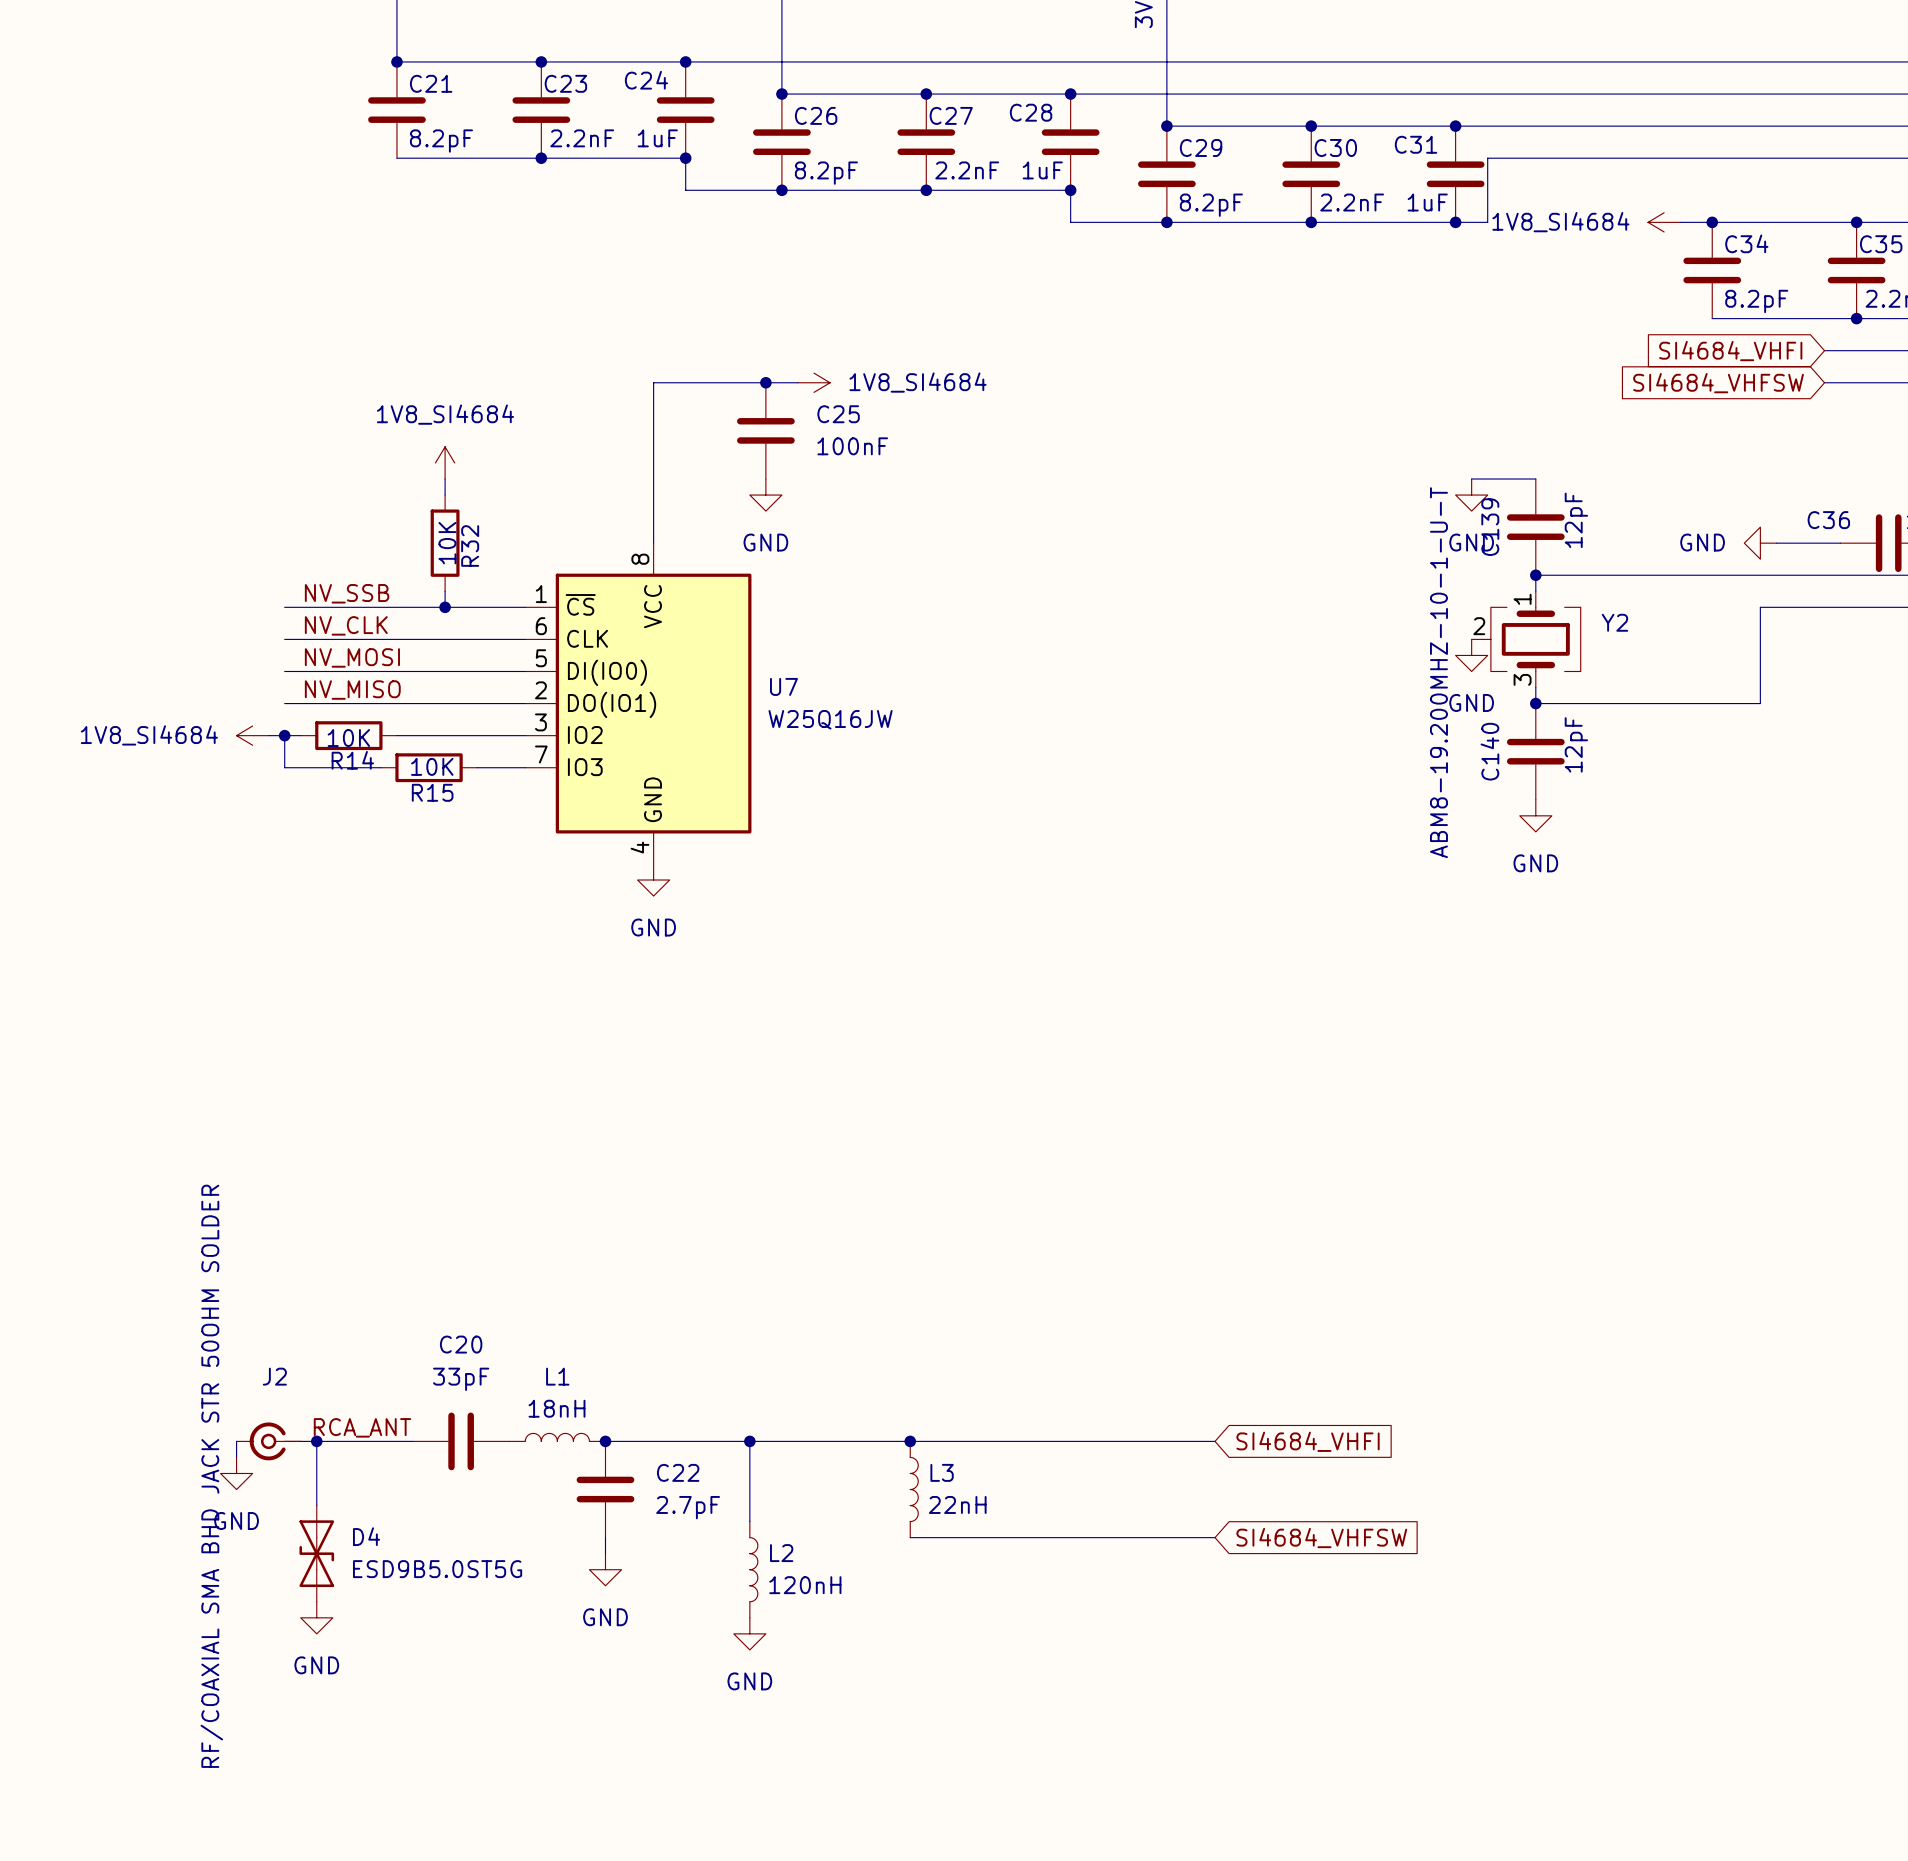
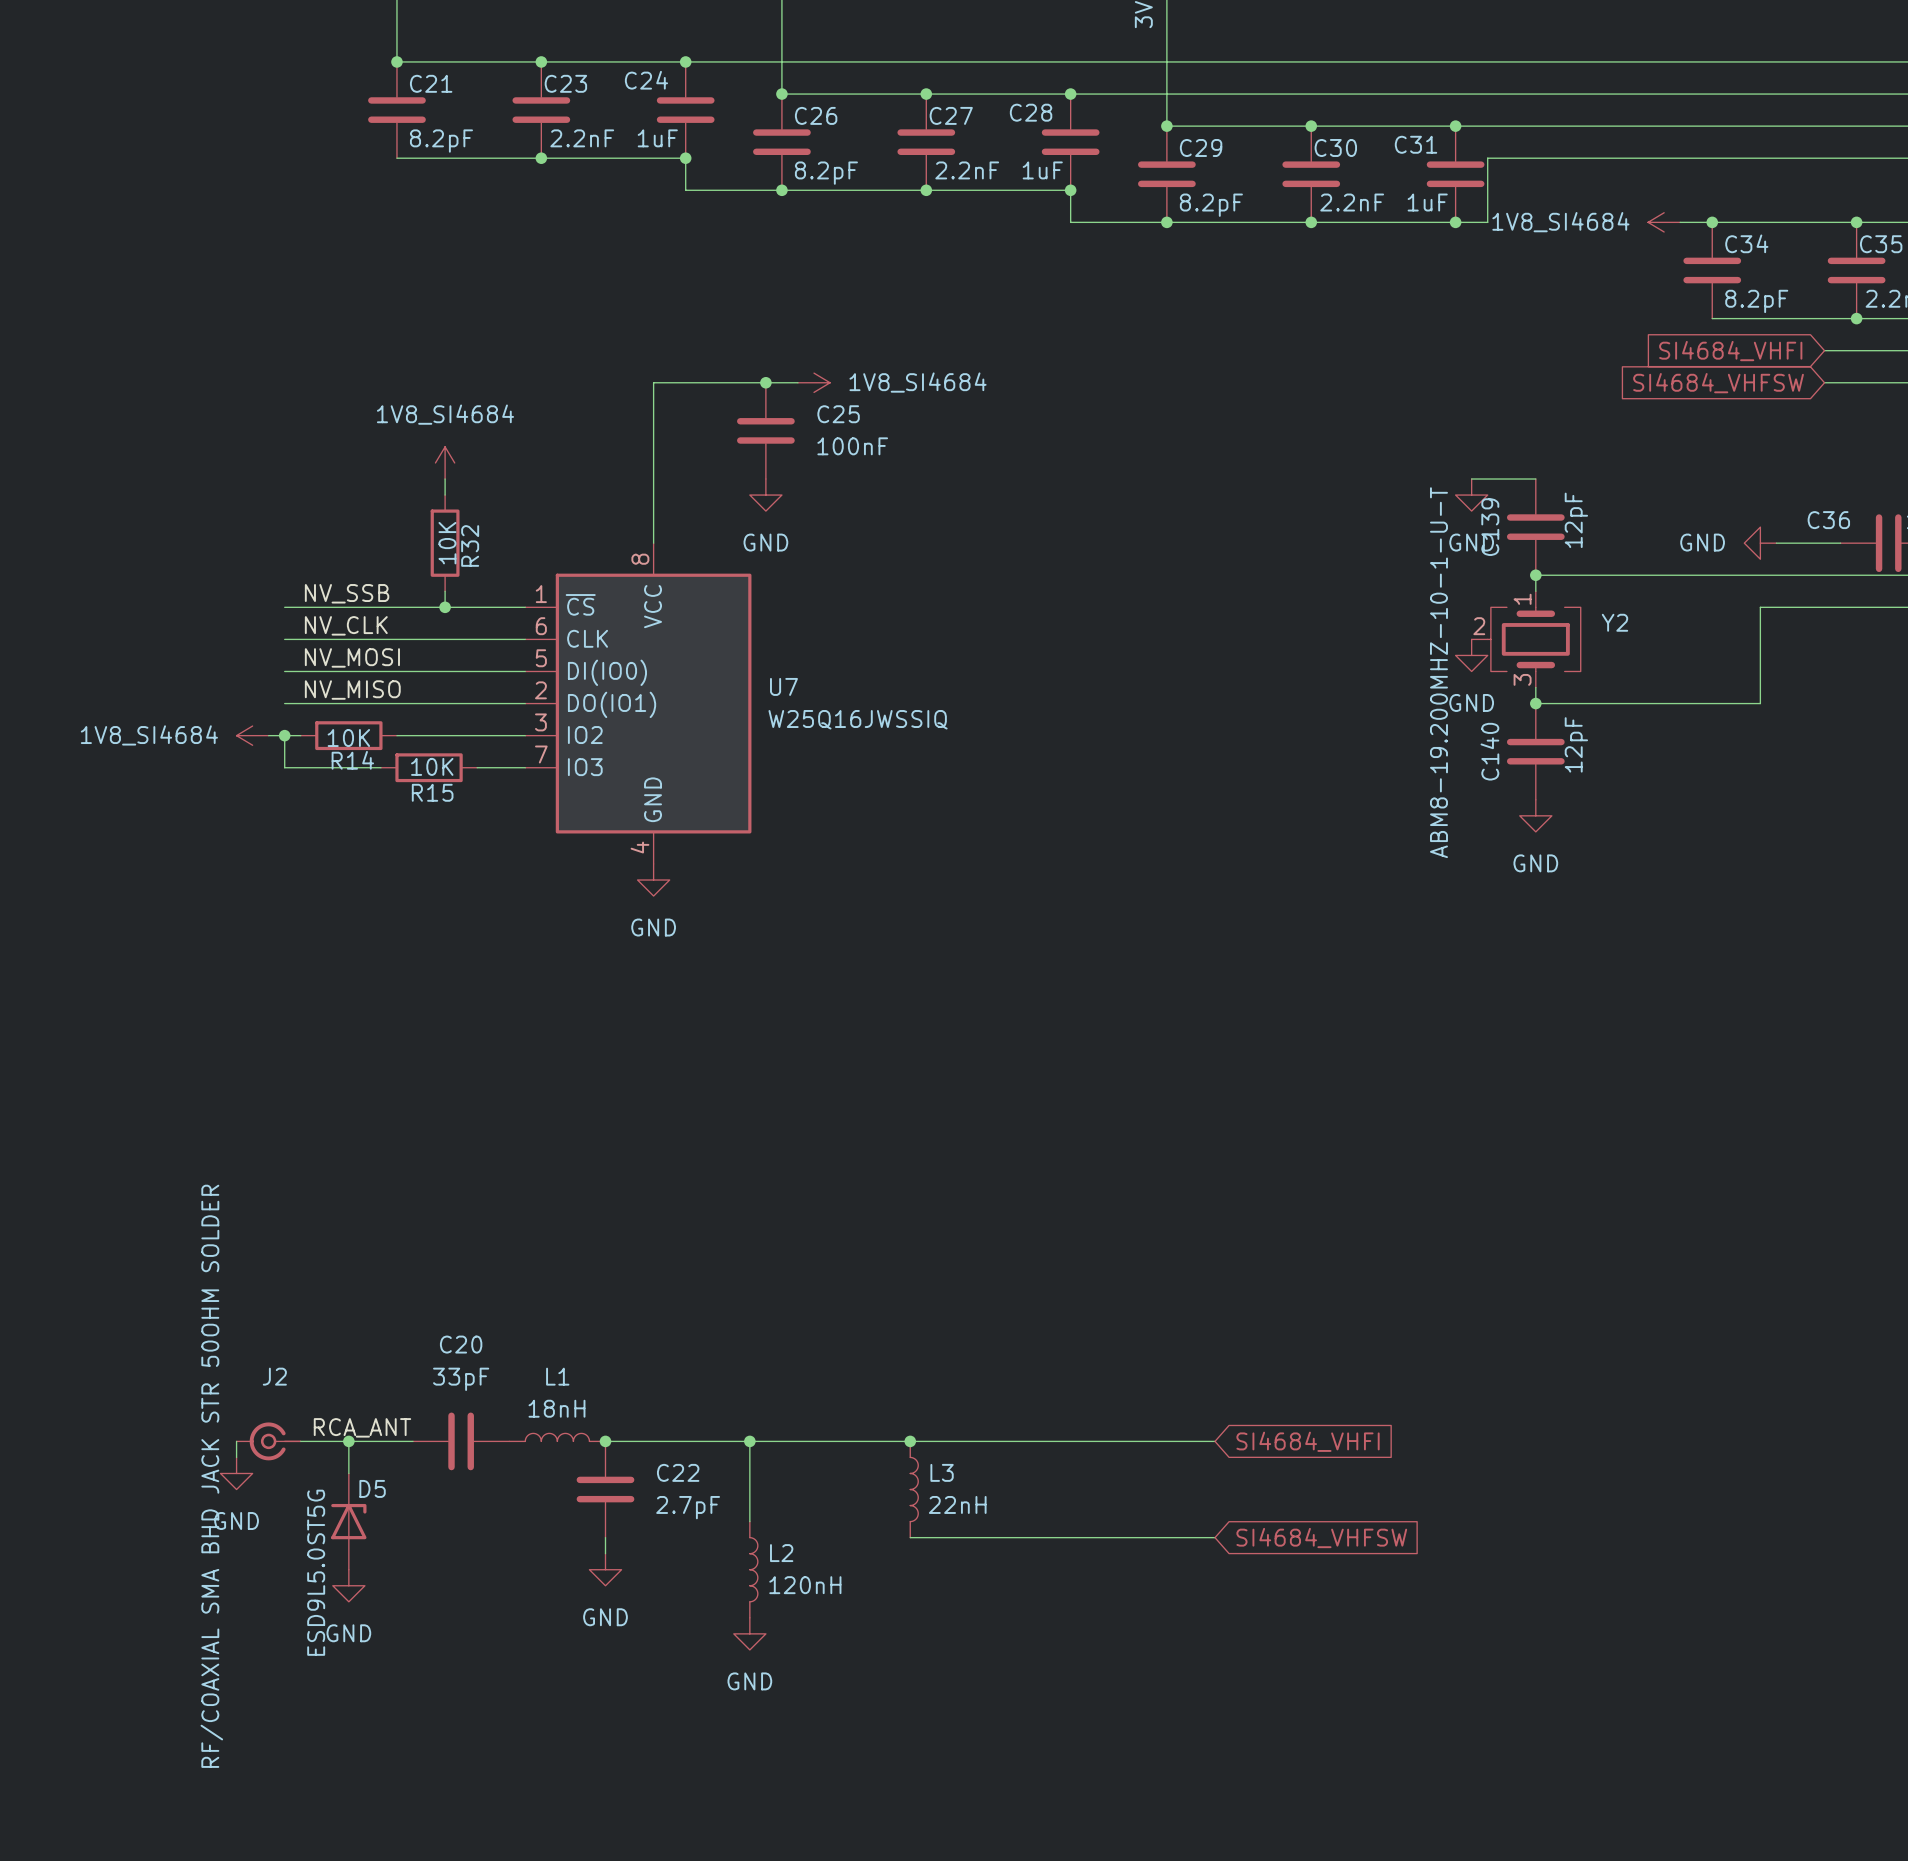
U7 value: W25Q16JW (830, 719) -> W25Q16JWSSIQ (858, 719)
wire: (316, 1441) (316, 1505) -> none
junction position: (316, 1441) -> (348, 1441)
wire: none -> (348, 1441) (348, 1473)
D5: none -> ESD9L5.0ST5G (348, 1521)
D4: ESD9B5.0ST5G (316, 1553) -> none
power symbol position: GND (316, 1617) -> GND (348, 1585)

